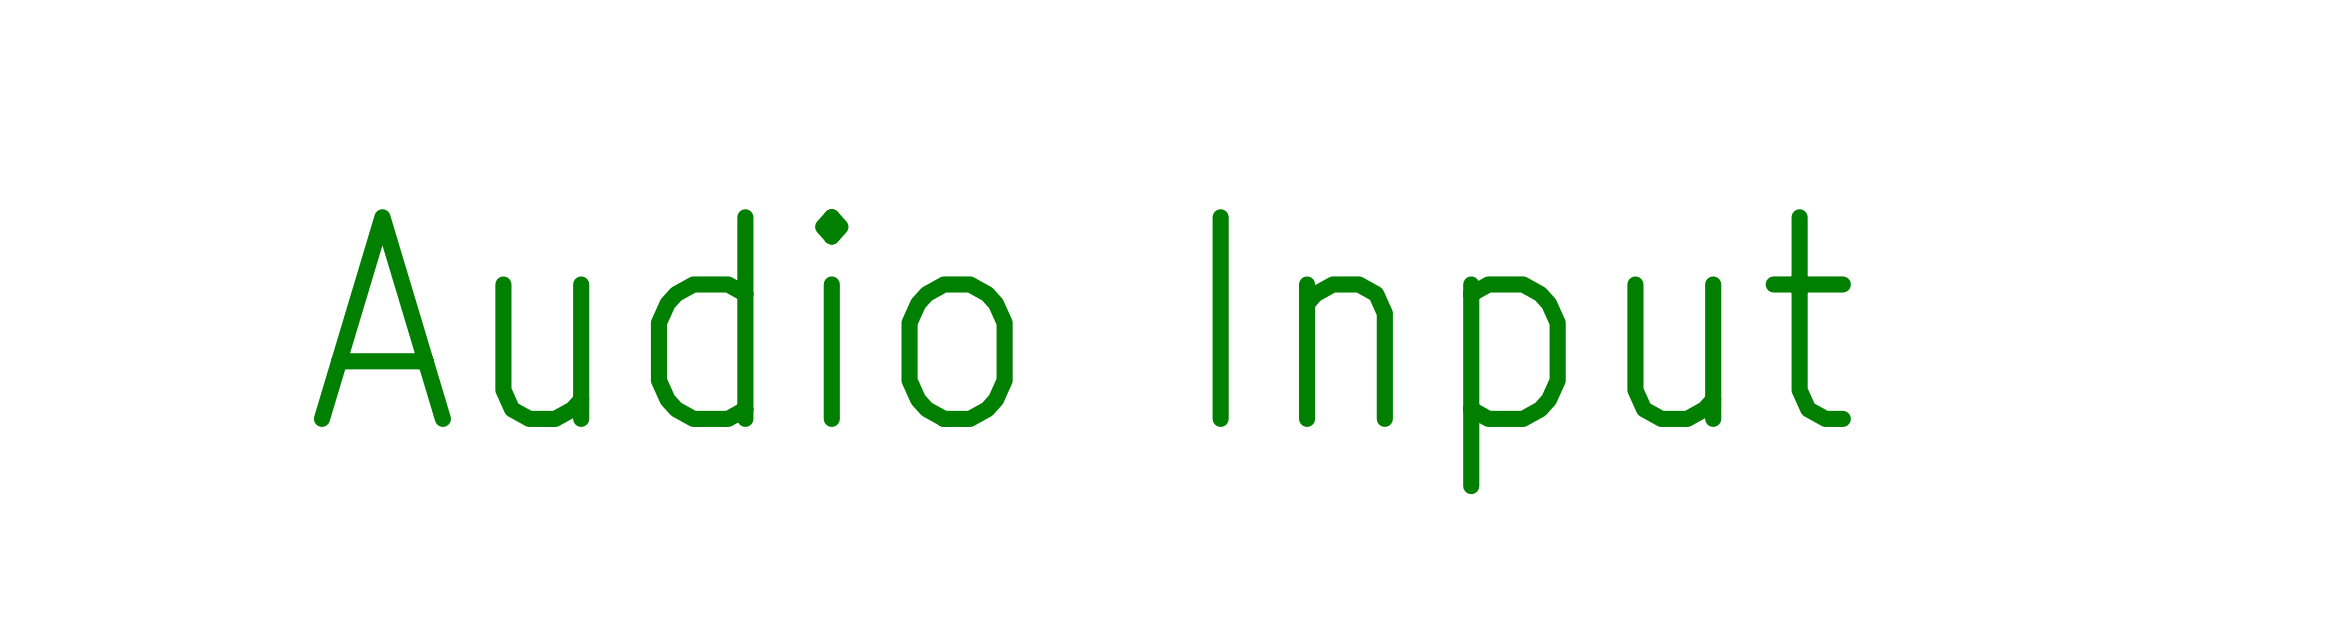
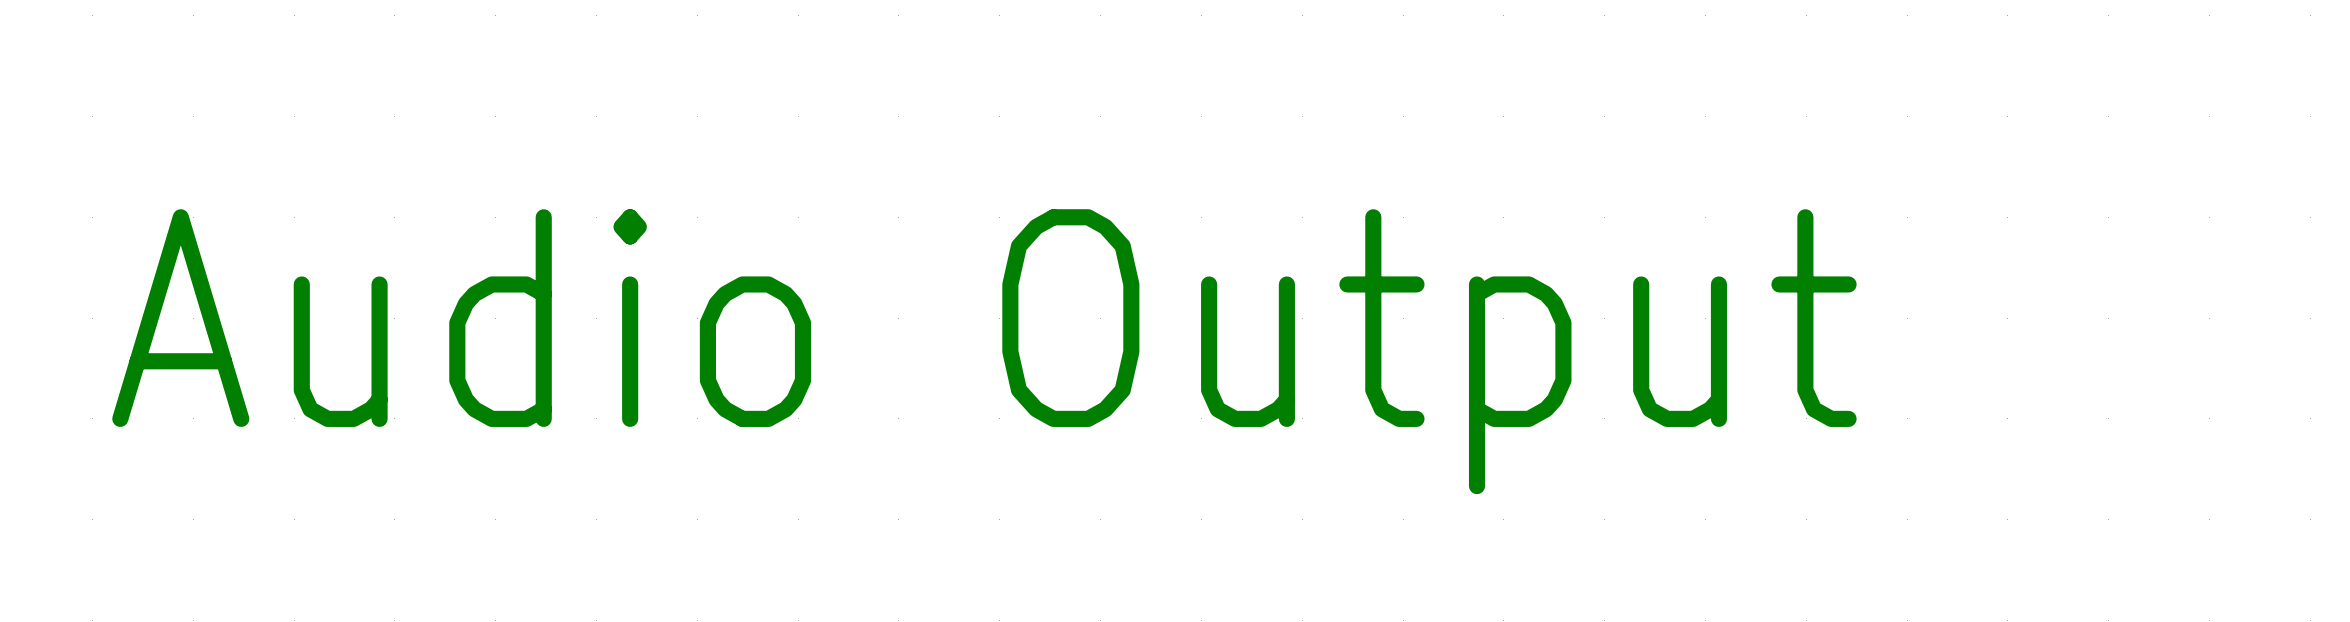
text: Audio Input (1082, 351) -> Audio Output (984, 351)

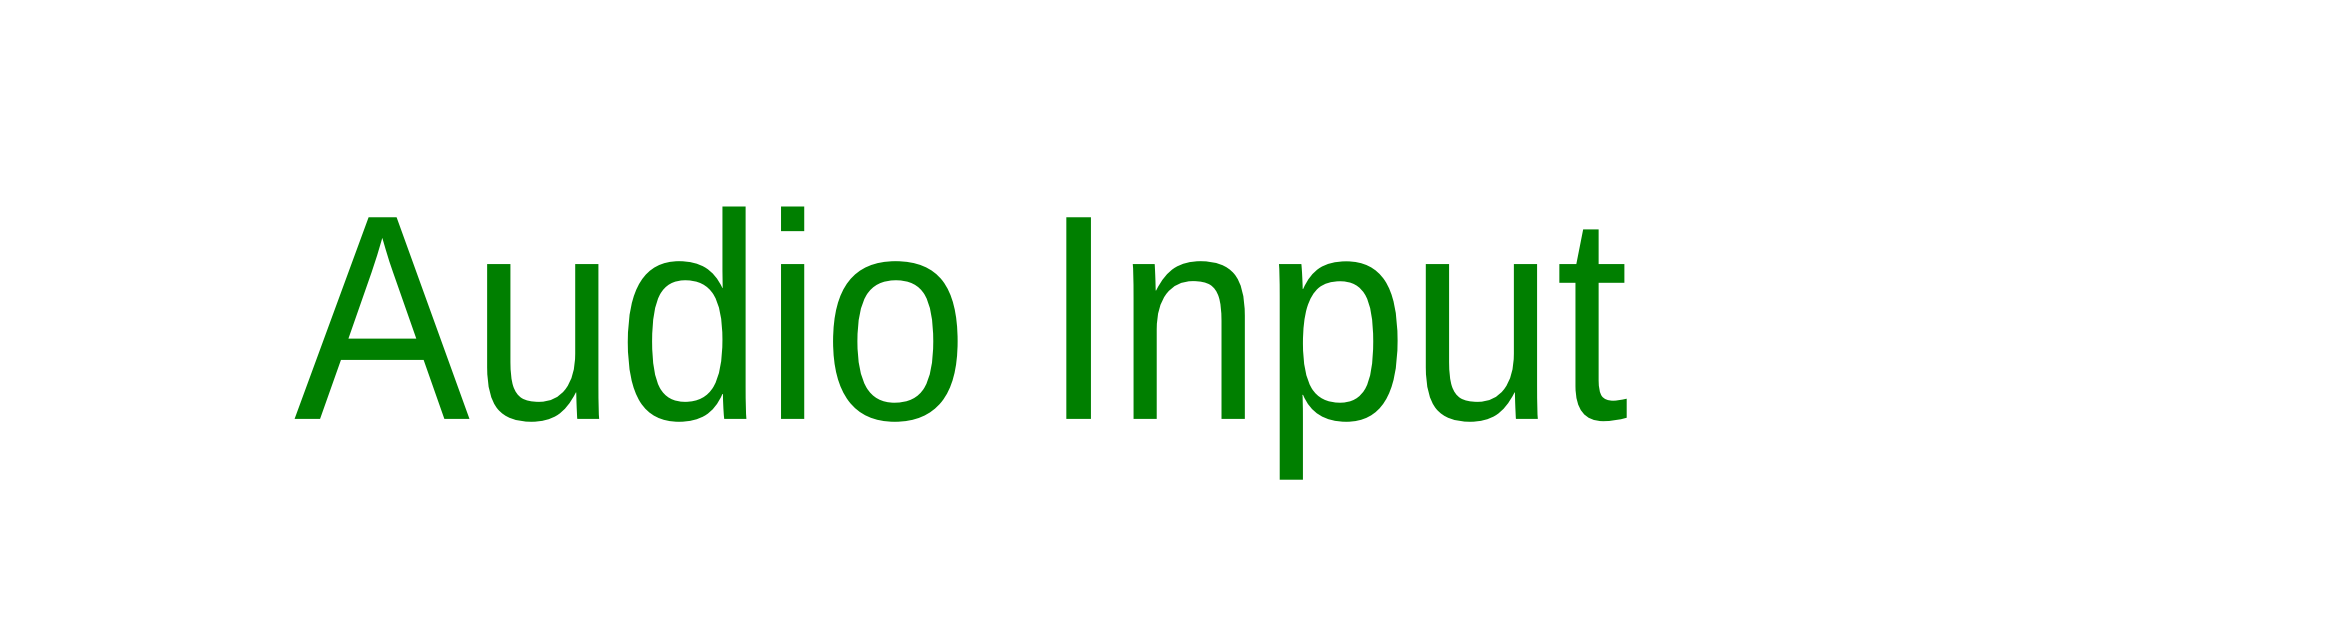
text: Audio Output (984, 351) -> Audio Input (960, 343)

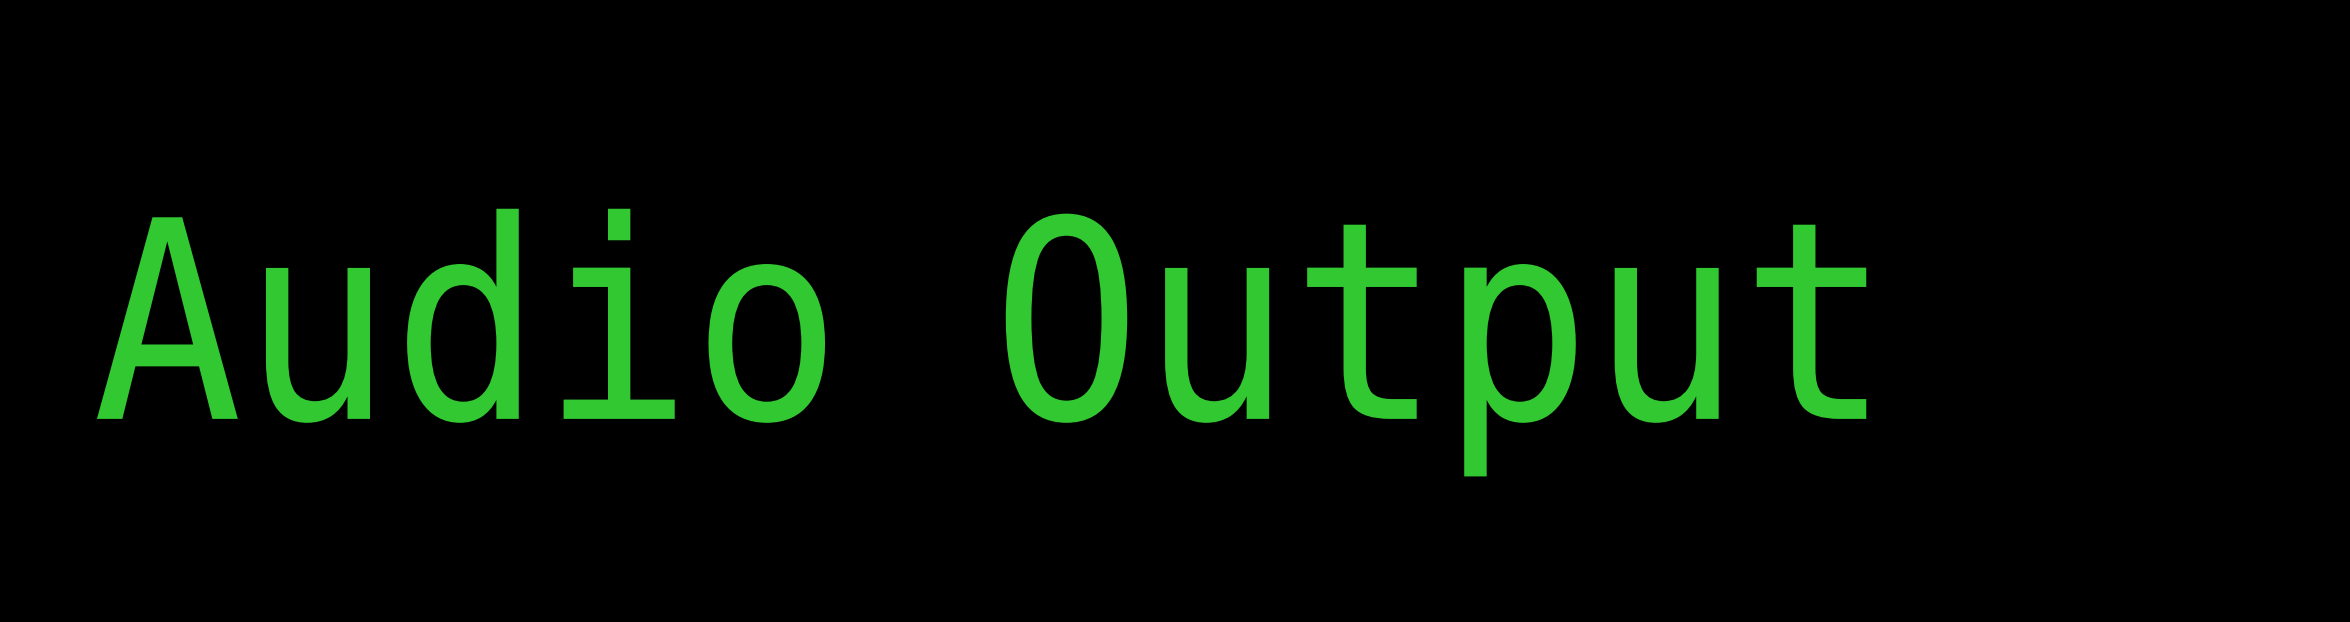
text: Audio Input (960, 343) -> Audio Output (981, 342)

